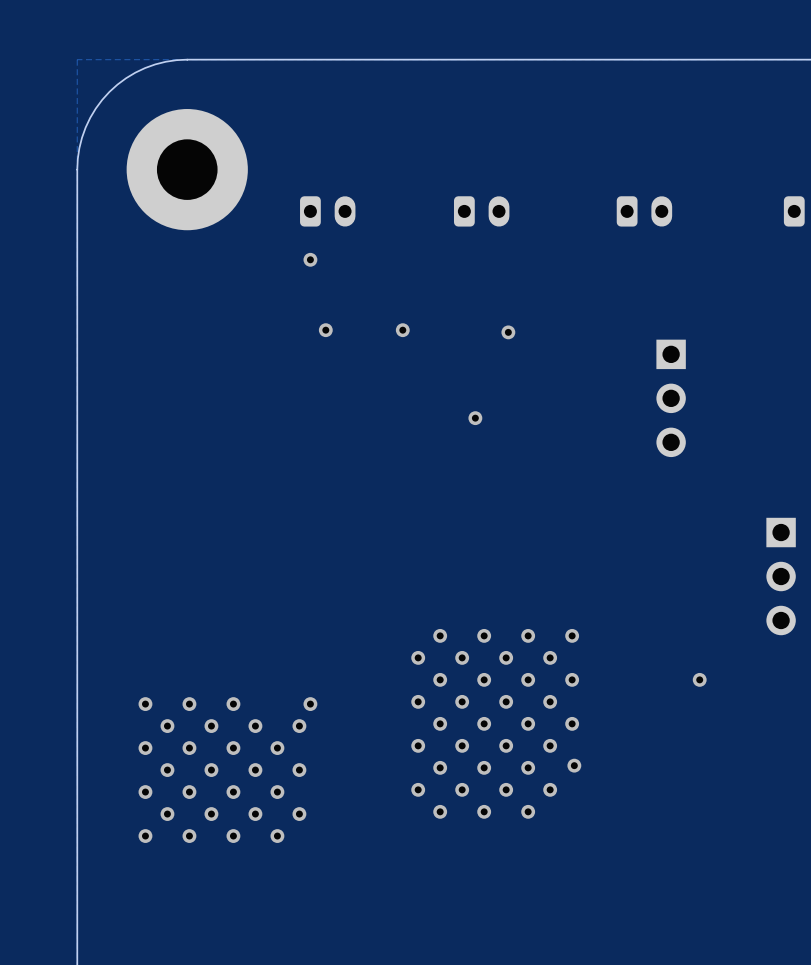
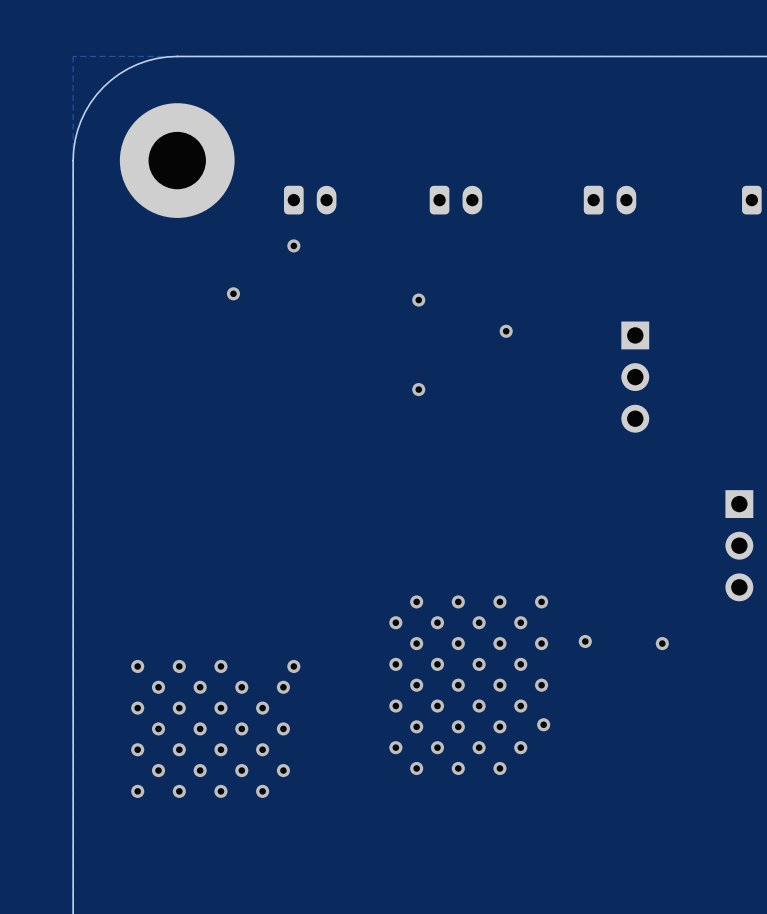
via: none -> (233, 293)
via: none -> (418, 300)
via: (325, 330) -> none
via: (402, 330) -> none
via position: (508, 332) -> (506, 331)
via position: (475, 418) -> (418, 389)
via: none -> (585, 641)

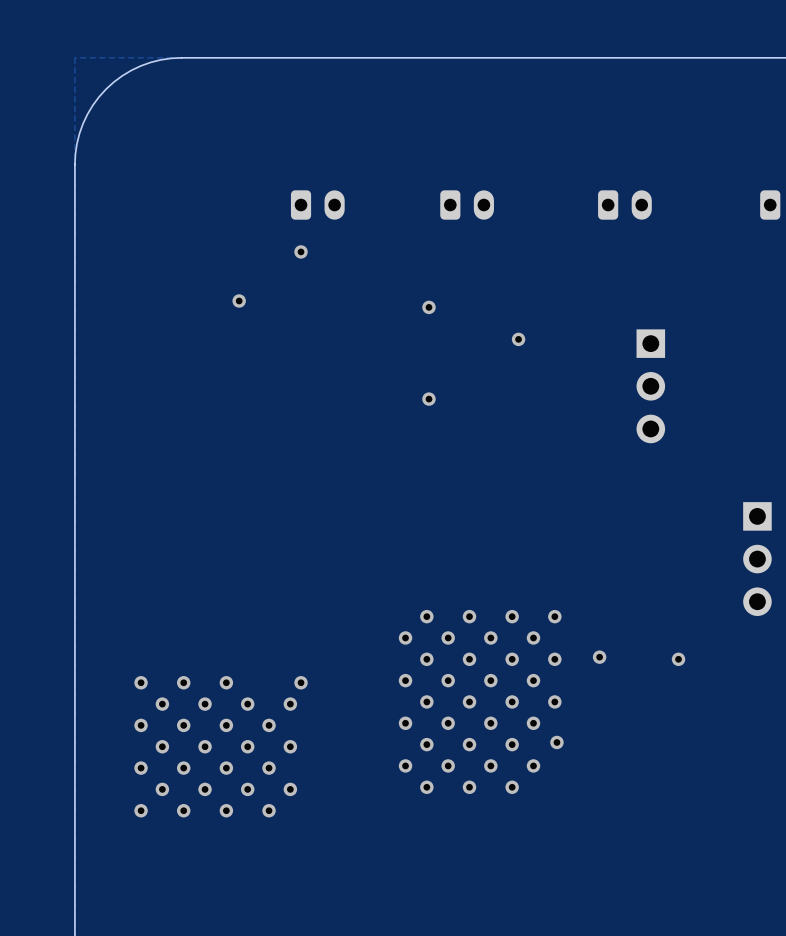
part: (177, 160) -> none

